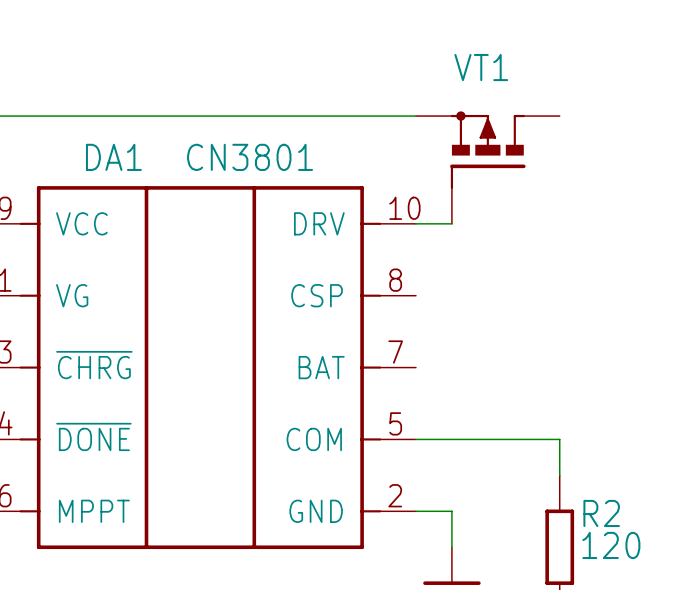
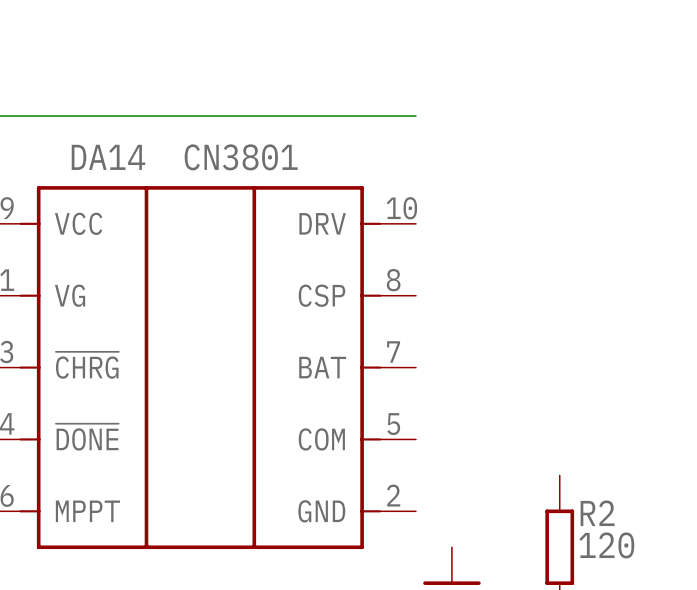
DA1 name: DA1 (113, 157) -> DA14 (108, 157)
VT1: (487, 167) -> none
wire: (415, 223) (451, 223) -> none
wire: (415, 439) (559, 439) (559, 475) -> none
wire: (415, 511) (451, 511) (451, 547) -> none

